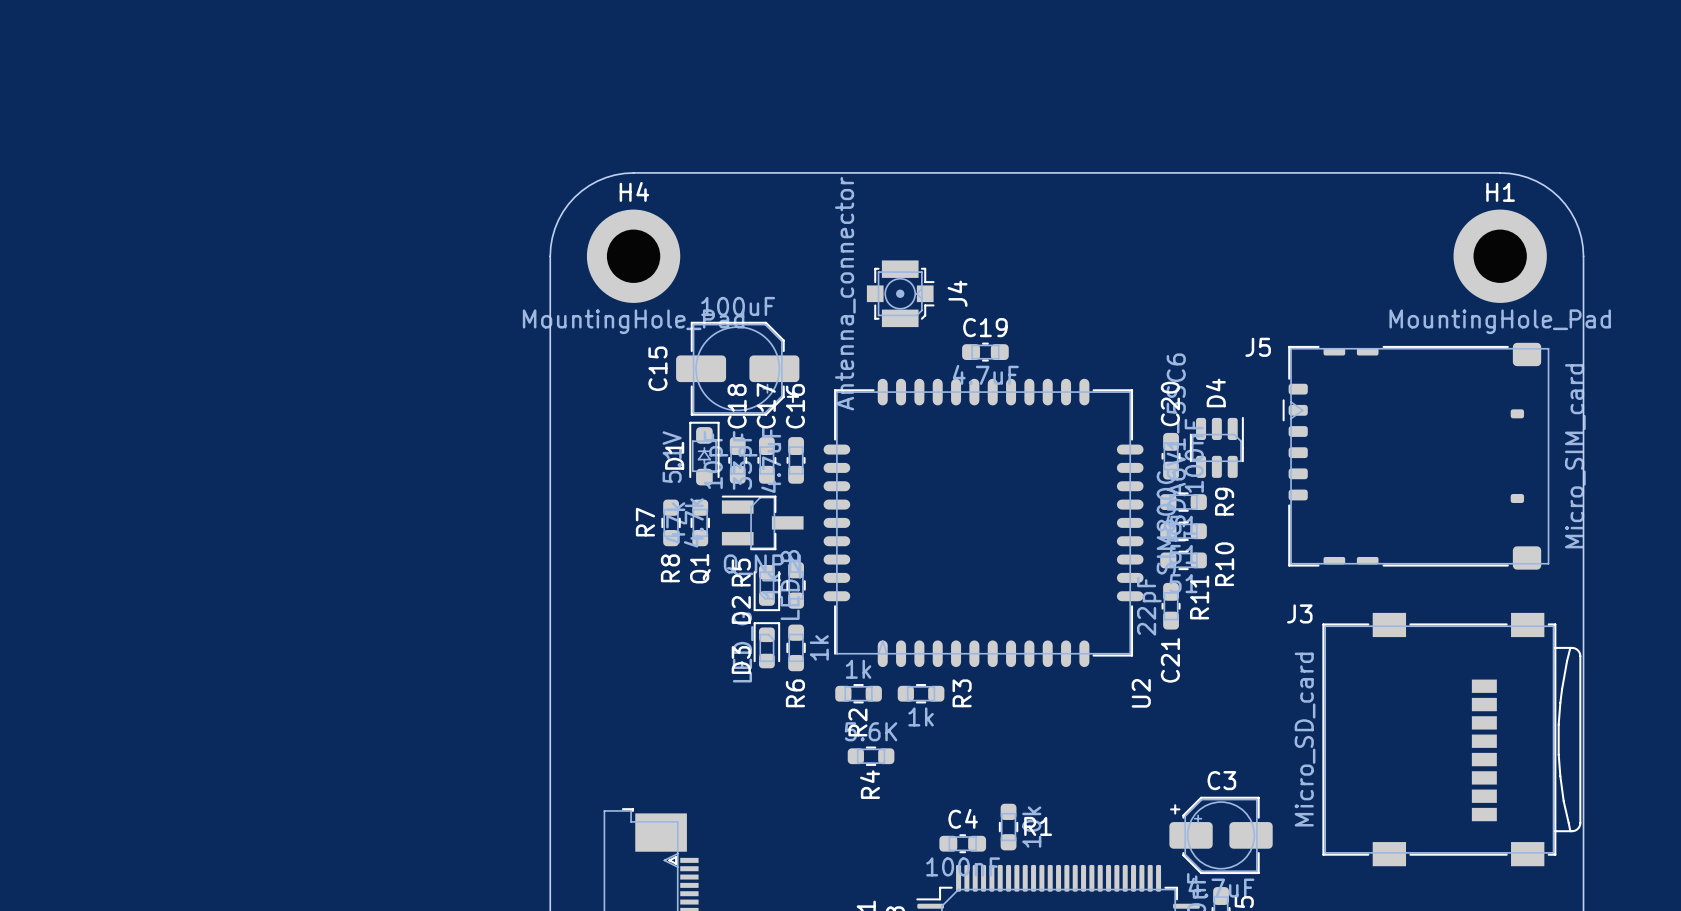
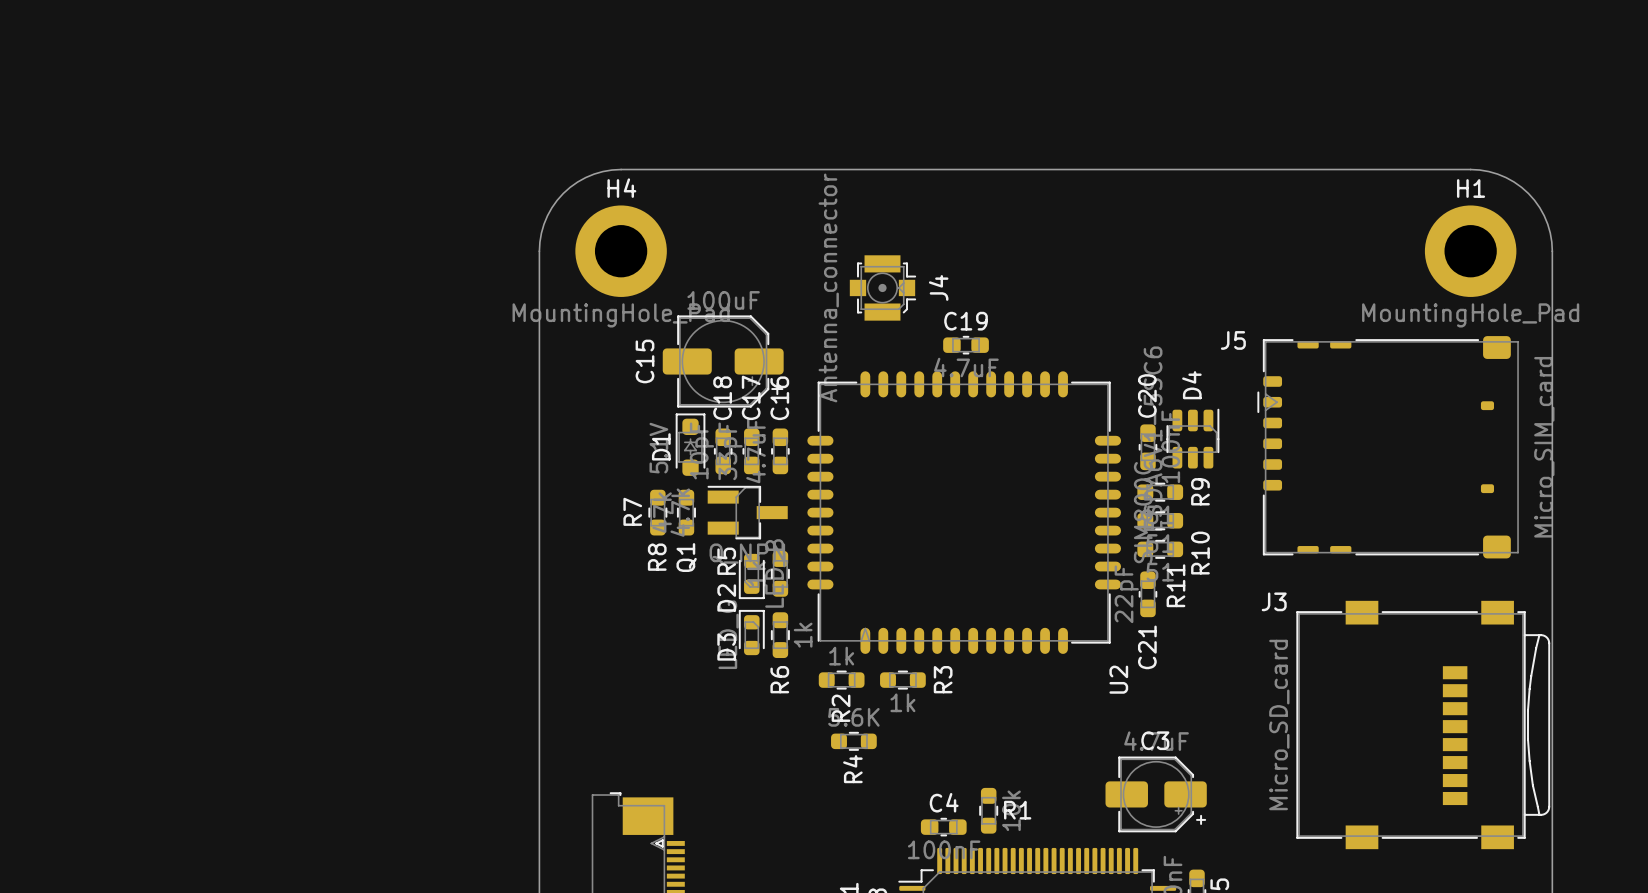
C3 rotation: 0° (1221, 835) -> 180° (1156, 794)

